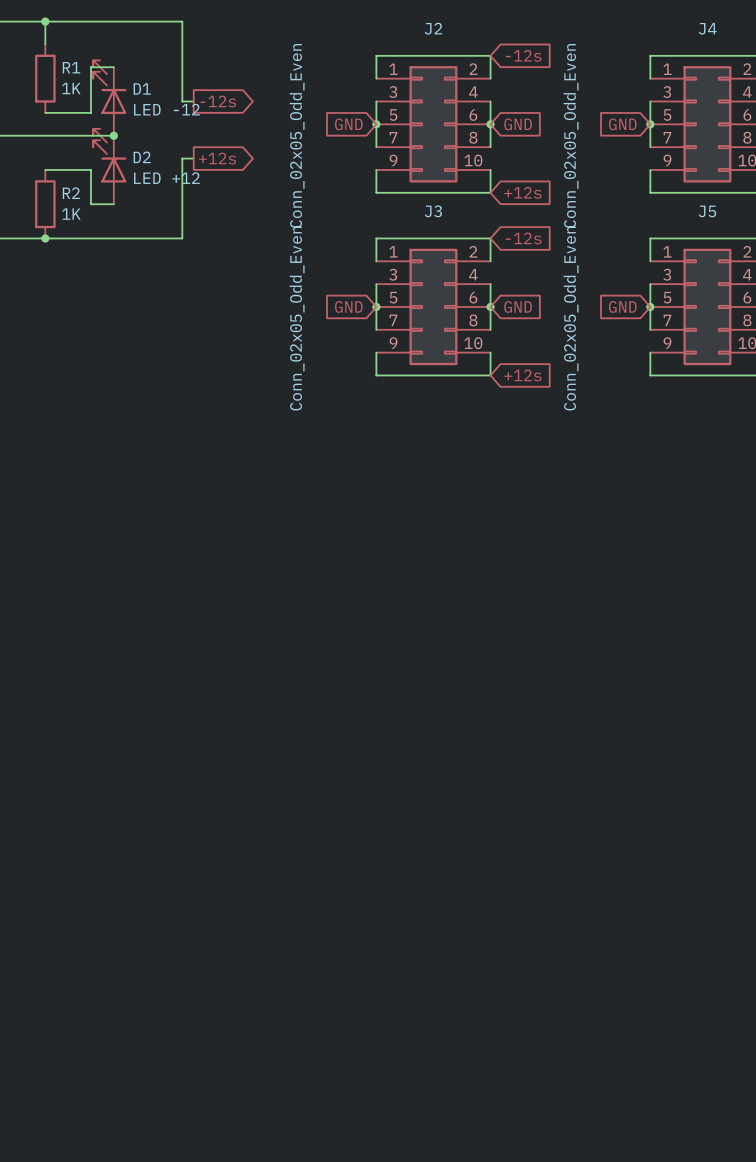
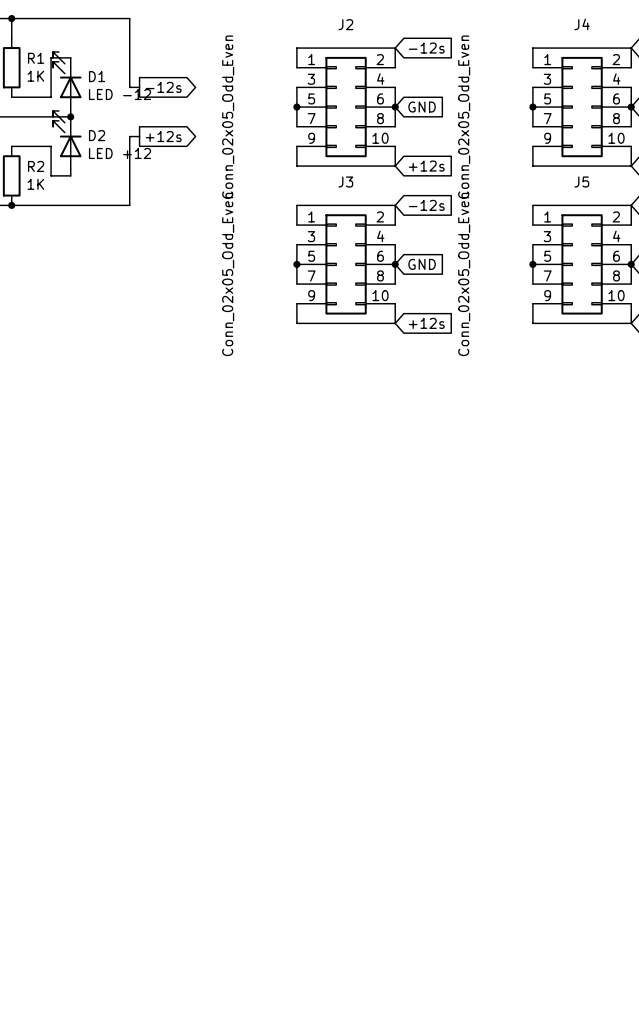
global label: GND (348, 124) -> none
global label: GND (622, 124) -> none
global label: GND (348, 306) -> none
global label: GND (622, 306) -> none

